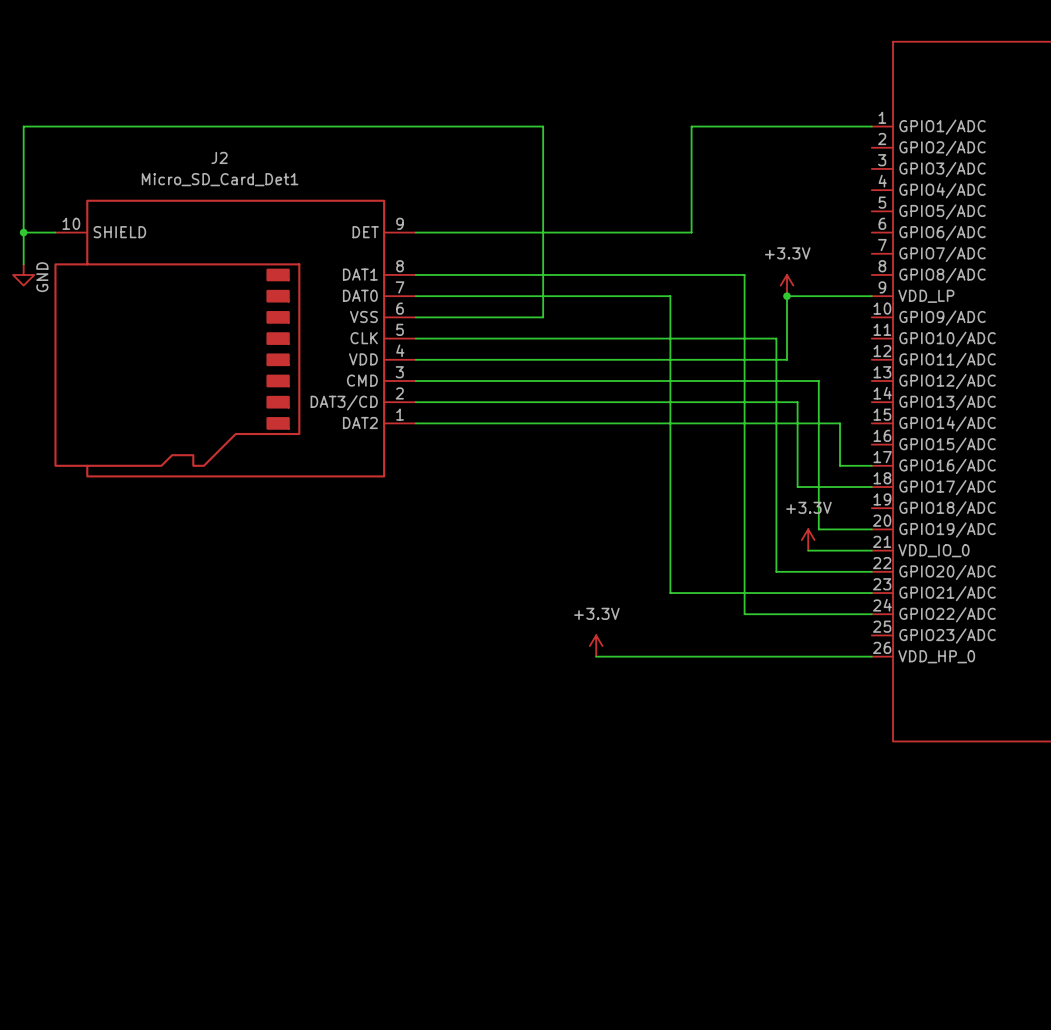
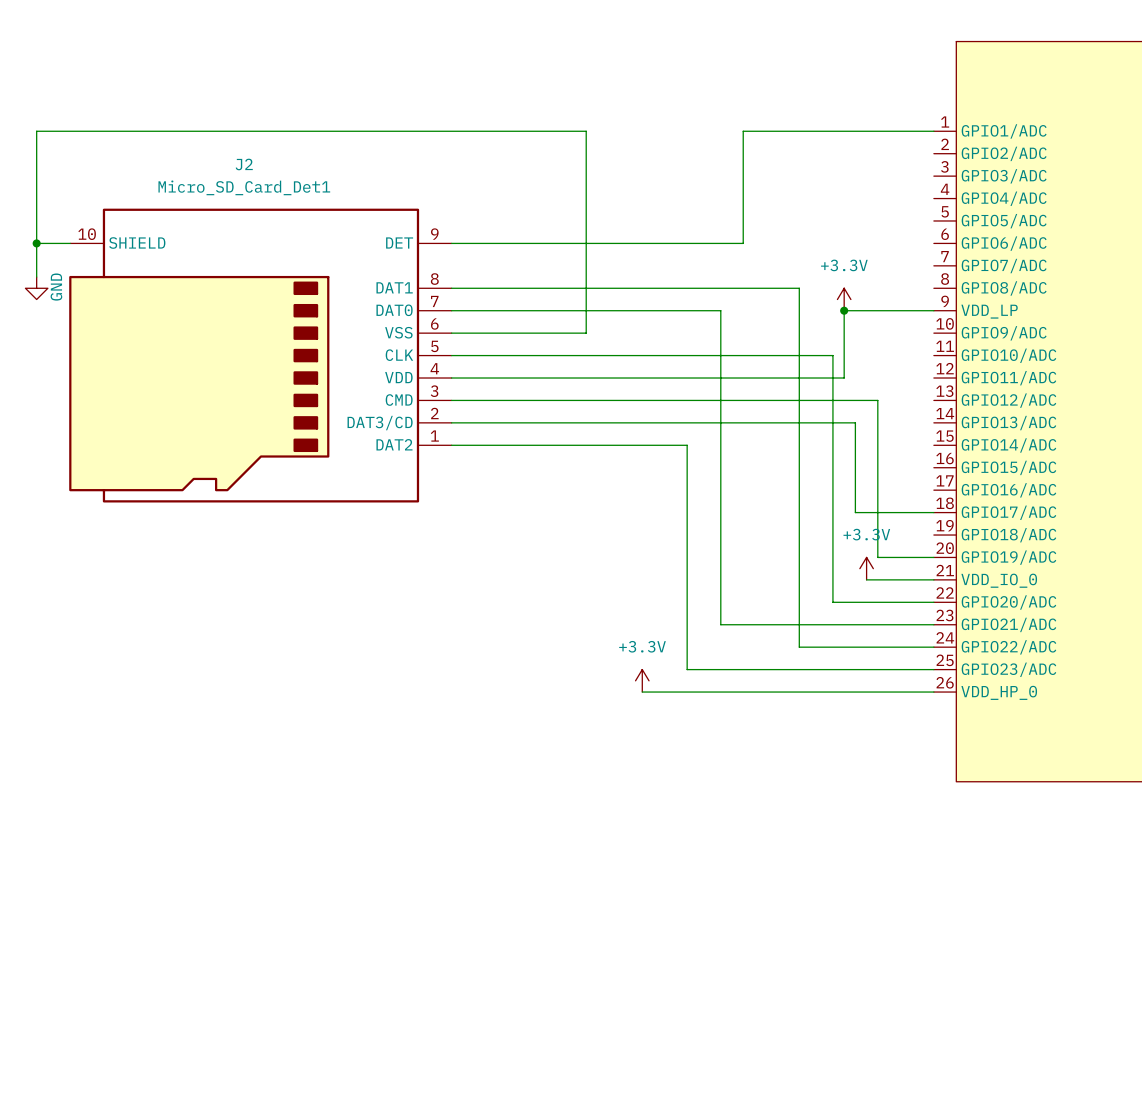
wire: (638, 423) (840, 423) (840, 465) (871, 465) -> (687, 445) (687, 669) (933, 669)

